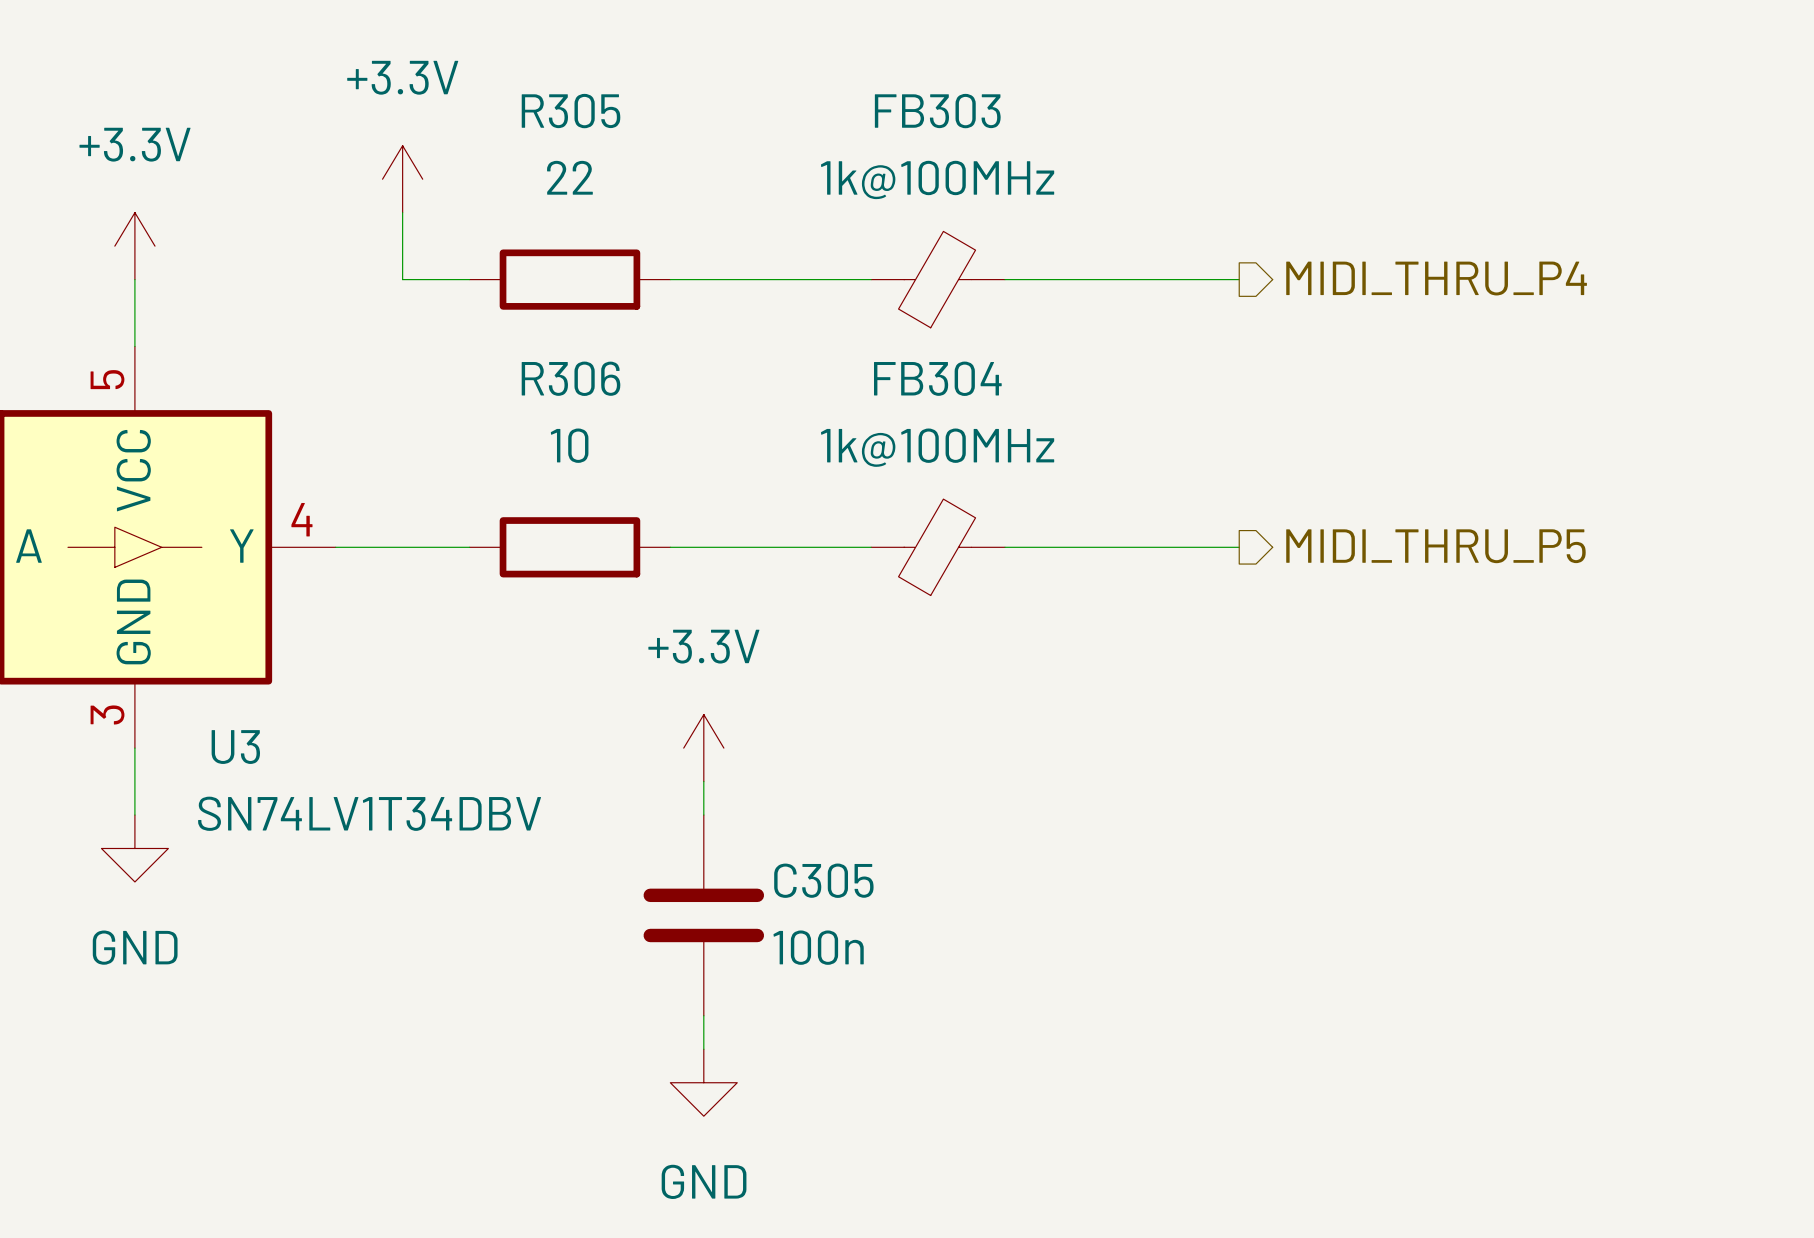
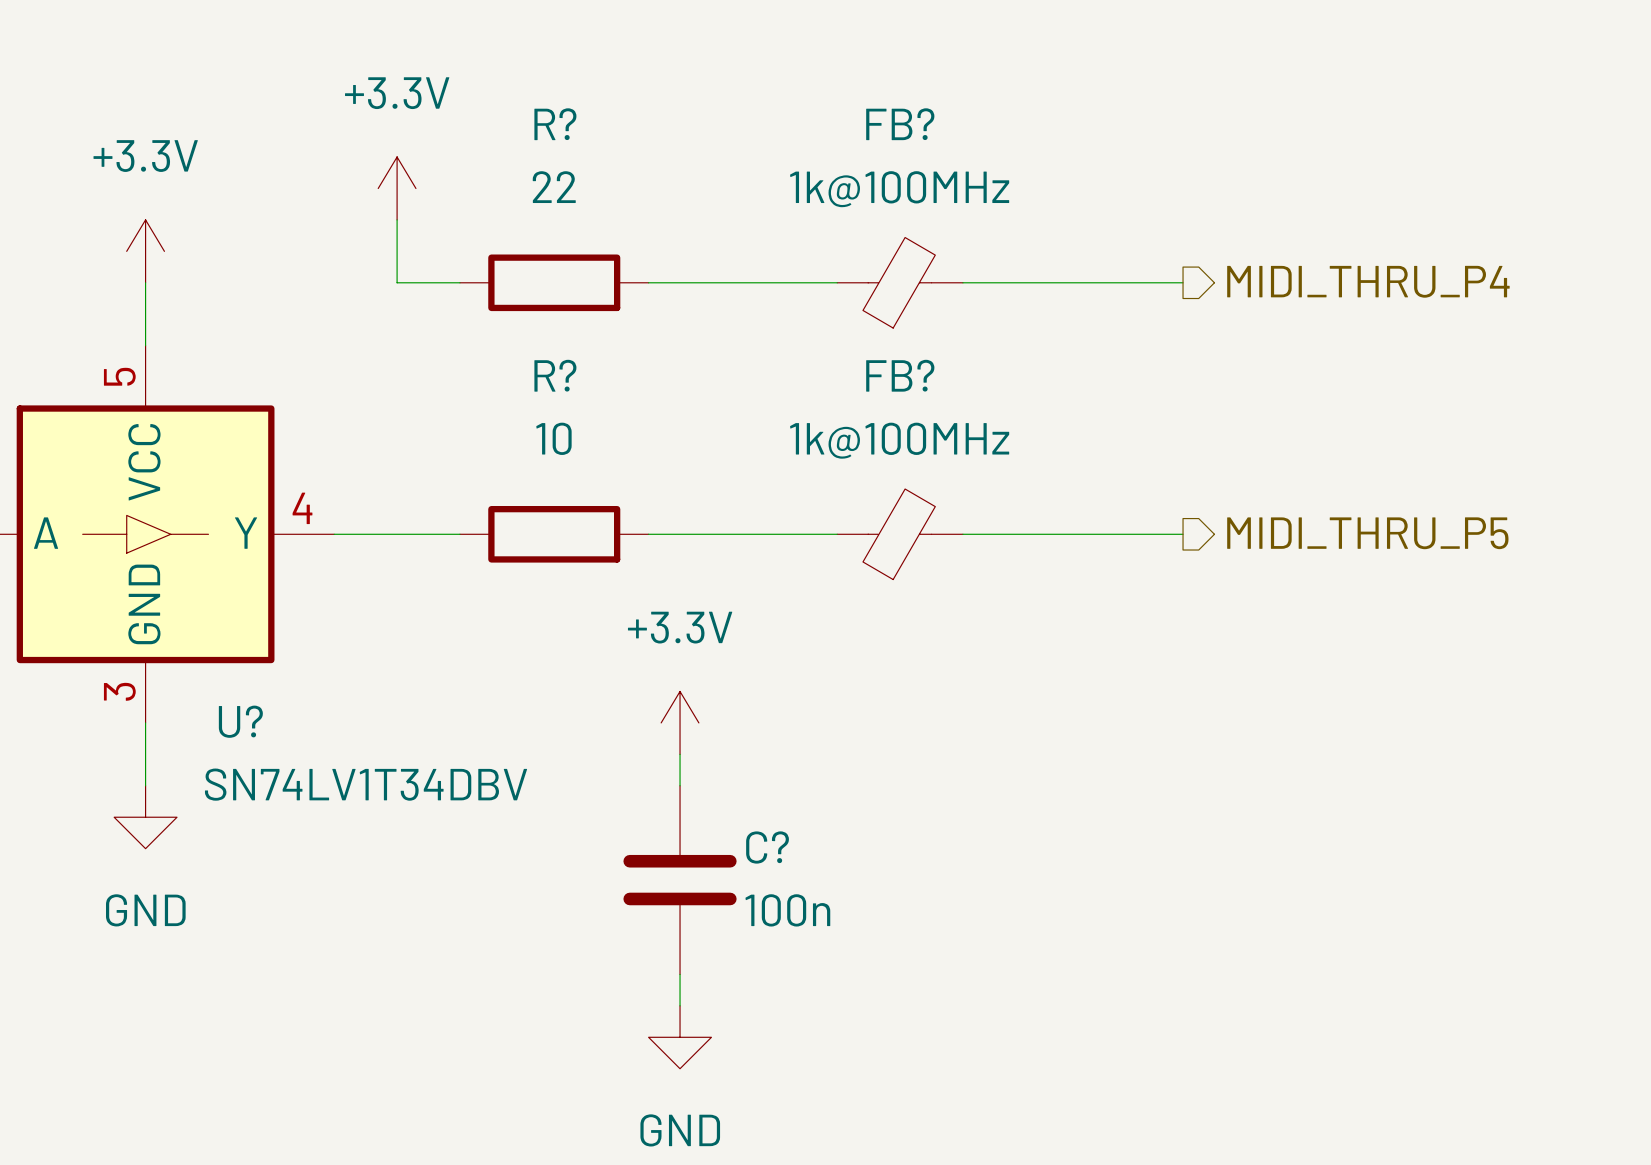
R305 name: R305 (571, 111) -> R? (555, 124)
FB303 name: FB303 (937, 111) -> FB? (900, 124)
R306 name: R306 (571, 378) -> R? (555, 375)
FB304 name: FB304 (937, 378) -> FB? (900, 375)
U3 name: U3 (235, 747) -> U? (240, 721)
C305 name: C305 (823, 880) -> C? (767, 847)

